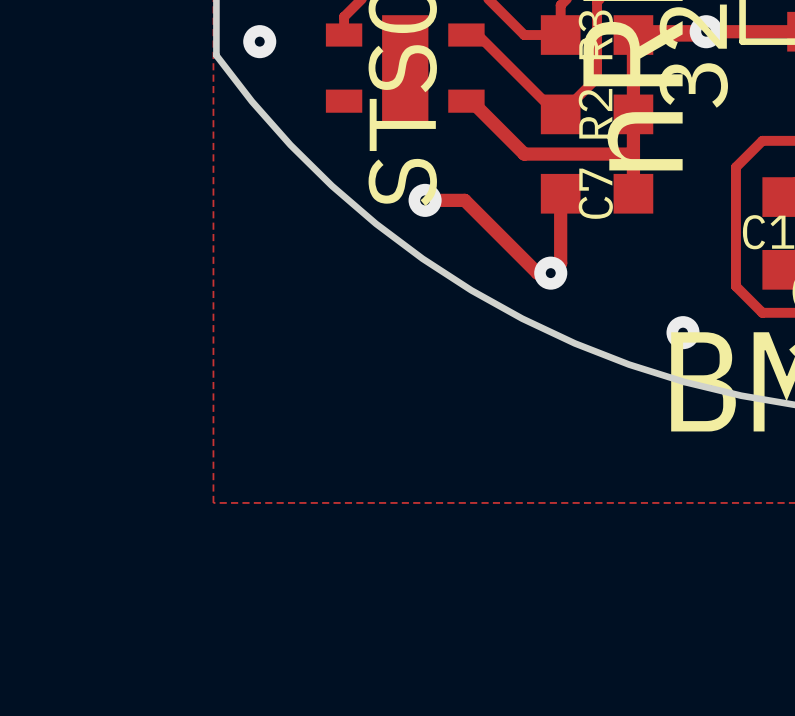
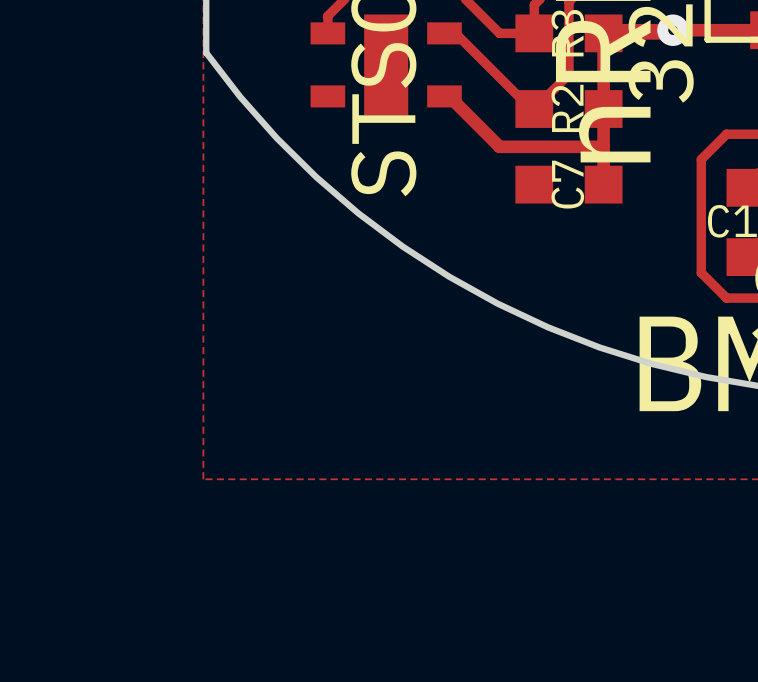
via: (259, 41) -> none
track: (560, 193) (560, 263) (550, 273) (537, 273) (464, 200) (425, 200) -> none
via: (425, 200) -> none
via: (550, 273) -> none
via: (683, 332) -> none

